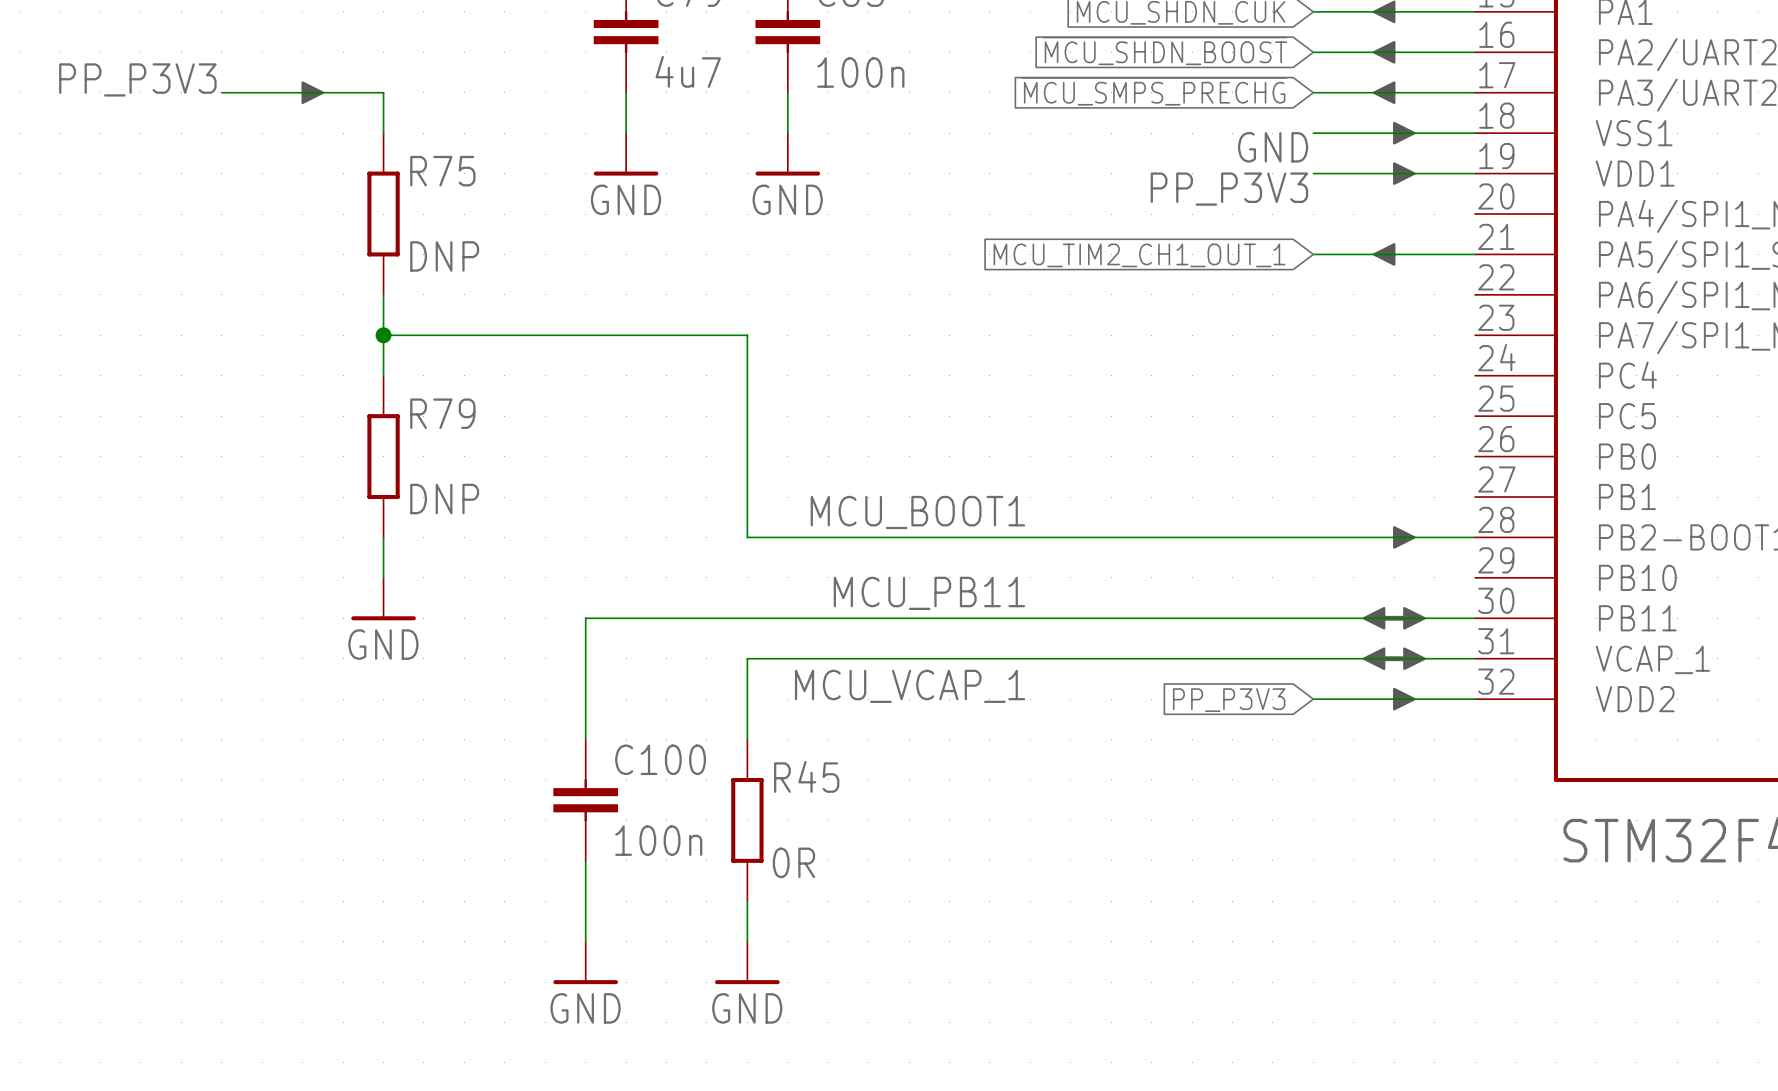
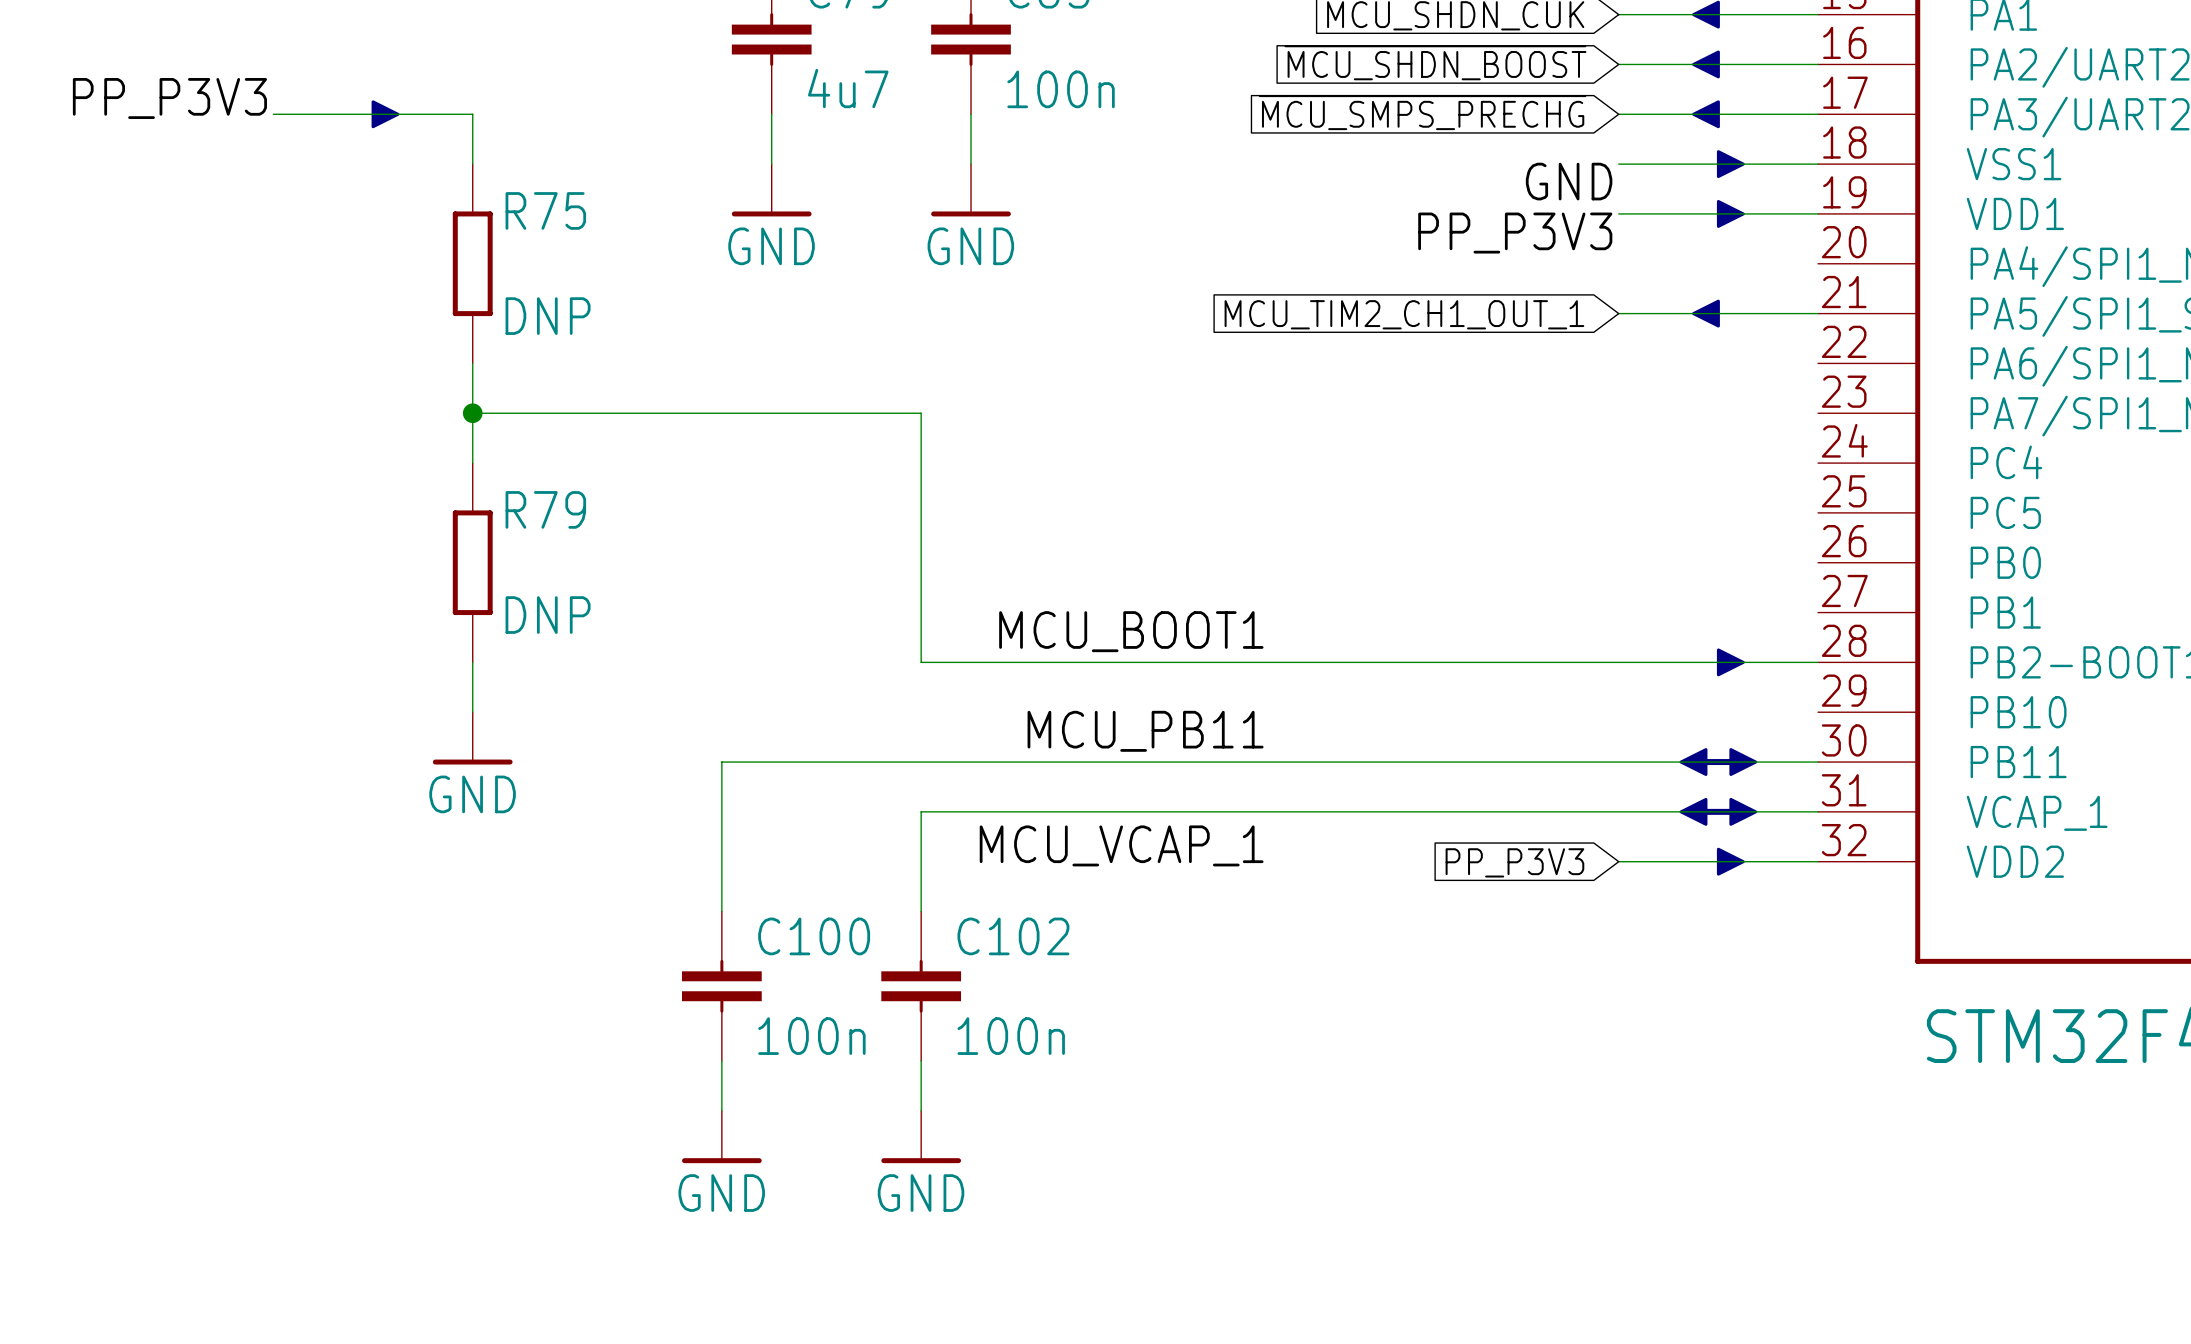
C102: none -> 100n (921, 986)
R45: 0R (747, 820) -> none
power symbol position: GND (585, 962) -> GND (721, 1136)
power symbol position: GND (747, 962) -> GND (921, 1136)

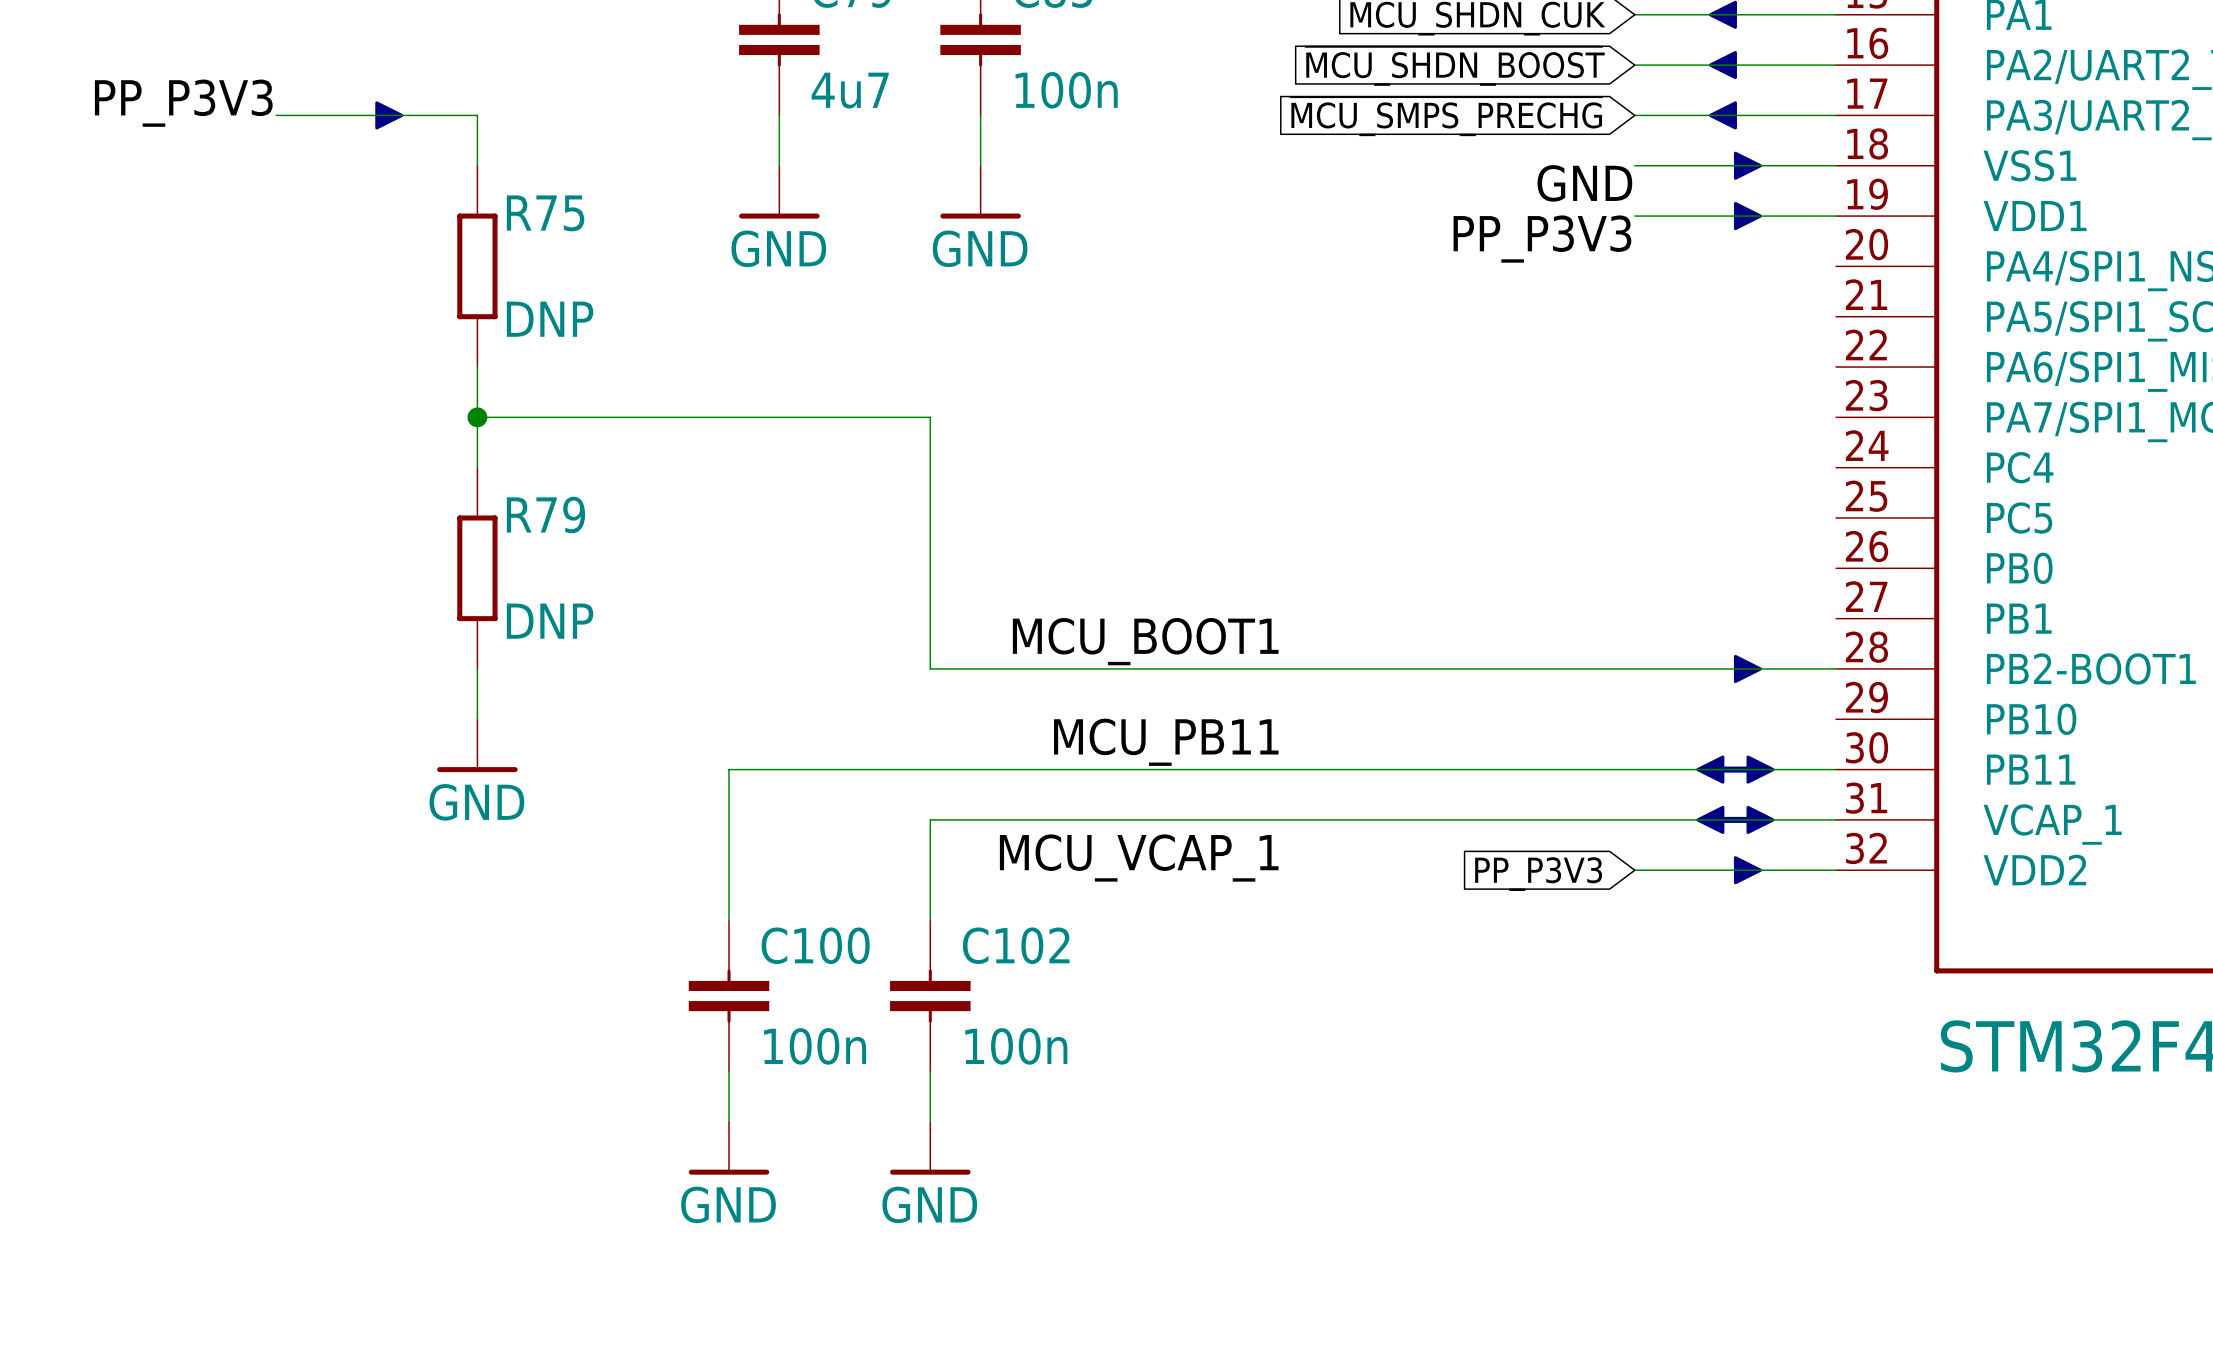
wire: (1618, 313) (1818, 313) -> none
part: (1705, 313) -> none
global label: MCU_TIM2_CH1_OUT_1 (1404, 314) -> none

